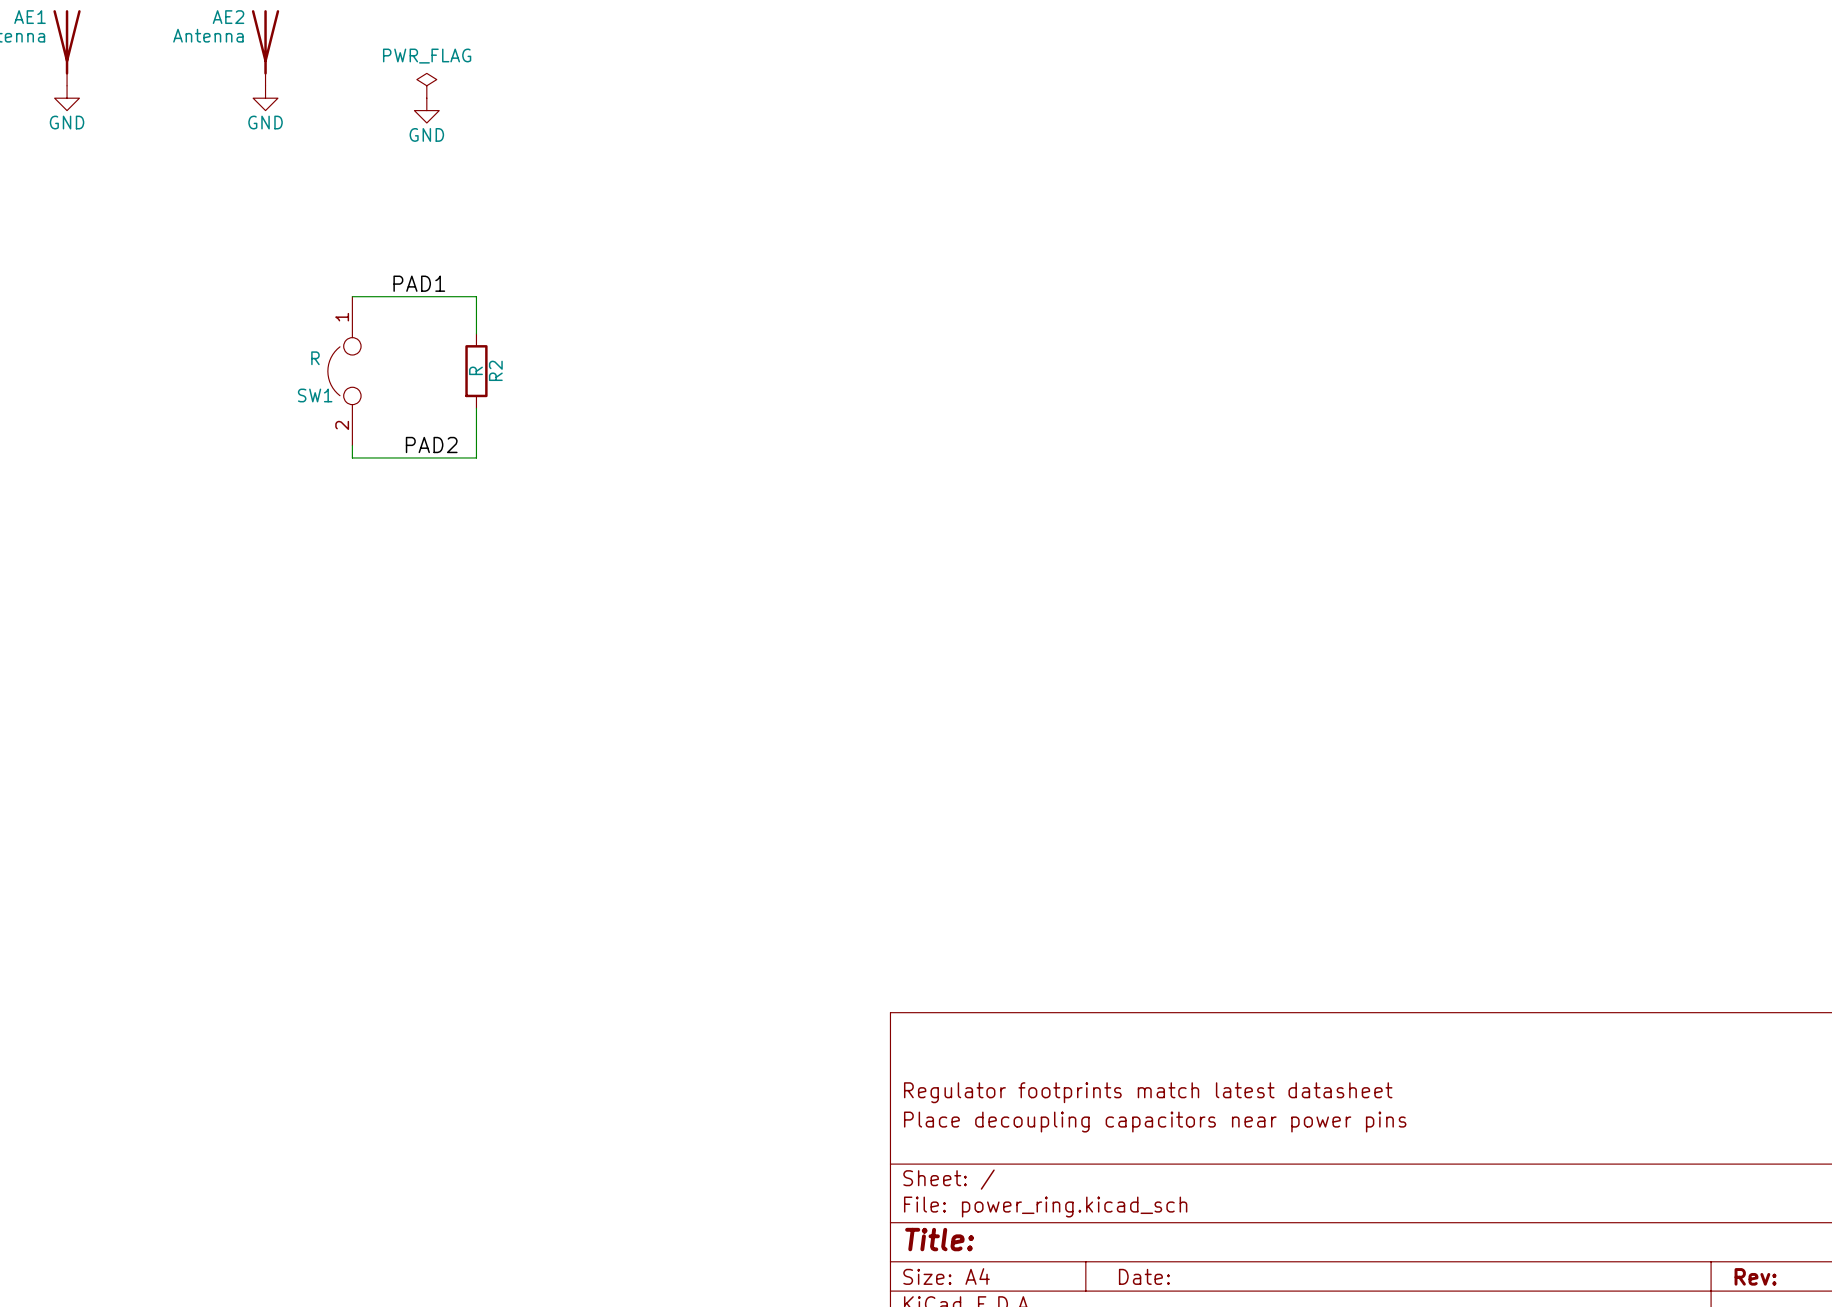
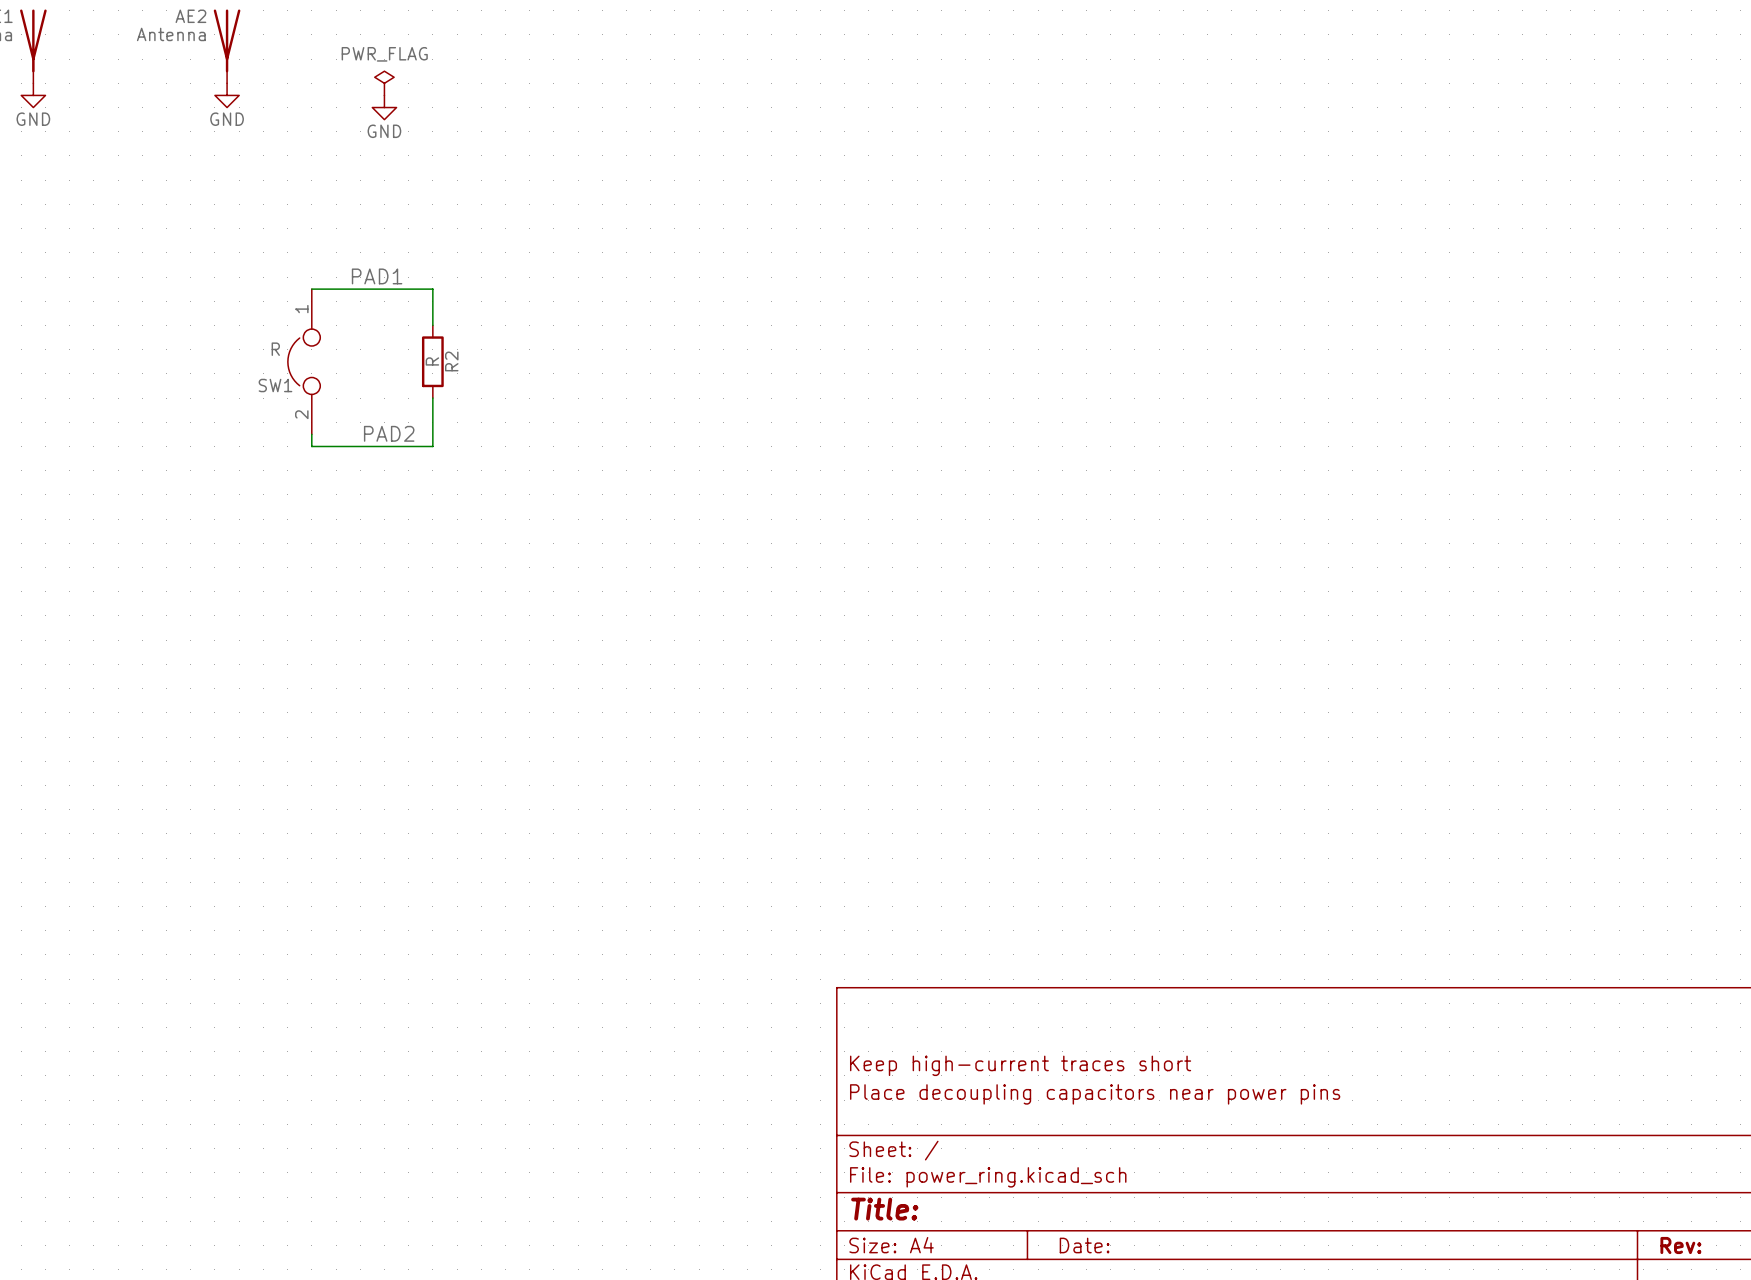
title block: Regulator footprints match latest datasheet (1148, 1092) -> Keep high-current traces short (1020, 1065)

